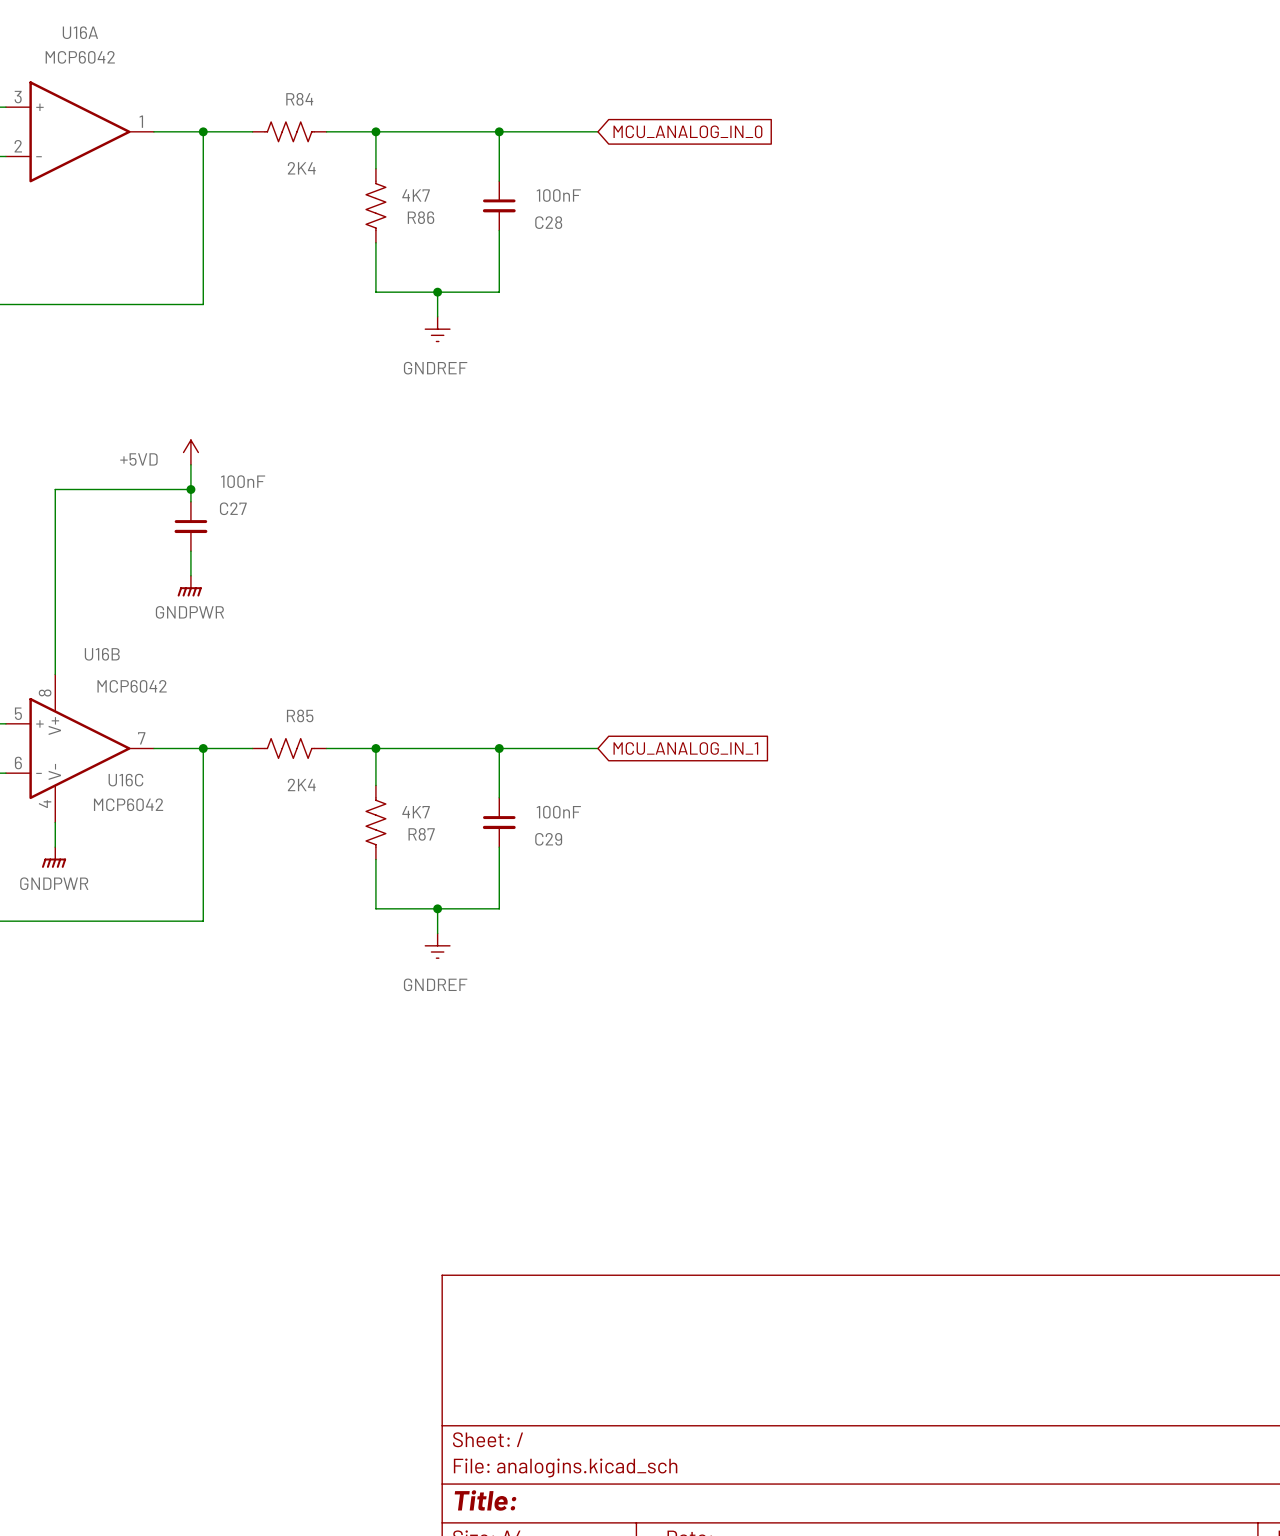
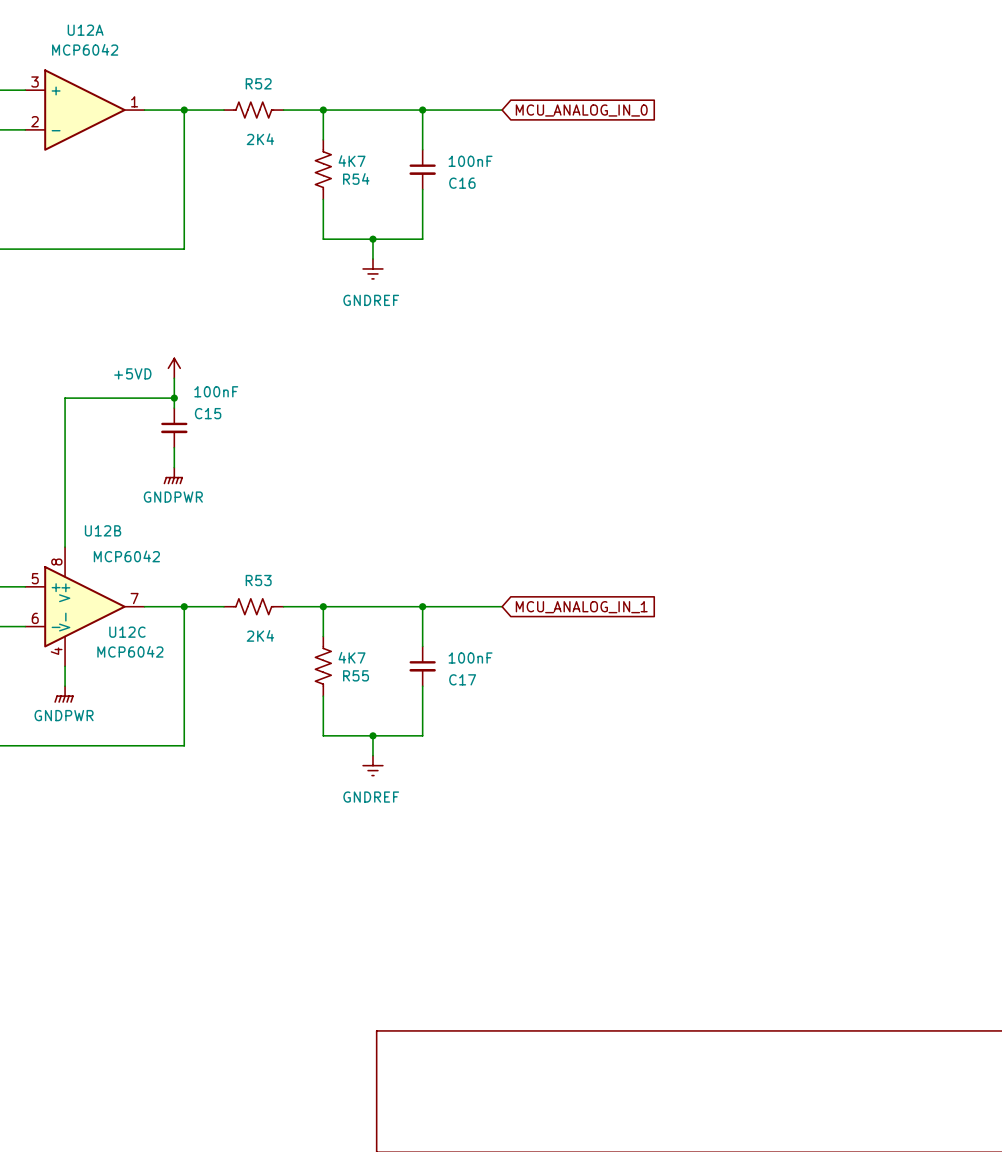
U16A name: U16A (80, 32) -> U12A (85, 30)
R84 name: R84 (299, 99) -> R52 (258, 83)
R86 name: R86 (421, 217) -> R54 (356, 178)
C28 name: C28 (548, 222) -> C16 (462, 183)
C27 name: C27 (233, 508) -> C15 (208, 413)
U16B name: U16B (102, 654) -> U12B (103, 530)
R85 name: R85 (300, 715) -> R53 (258, 580)
U16C name: U16C (125, 780) -> U12C (127, 632)
R87 name: R87 (421, 834) -> R55 (356, 675)
C29 name: C29 (548, 839) -> C17 (462, 679)

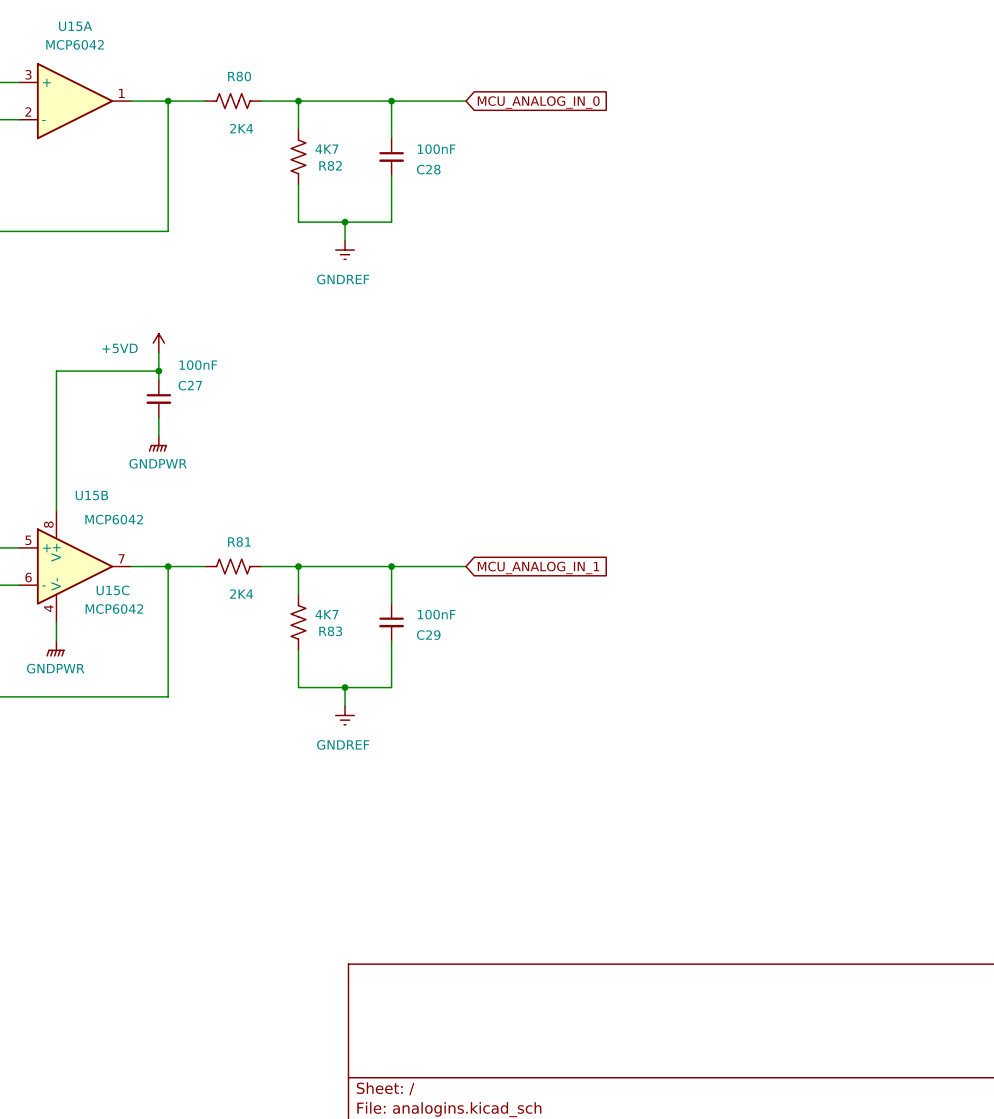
U12A name: U12A (85, 30) -> U15A (75, 26)
R52 name: R52 (258, 83) -> R80 (239, 76)
R54 name: R54 (356, 178) -> R82 (330, 165)
C16 name: C16 (462, 183) -> C28 (428, 169)
C15 name: C15 (208, 413) -> C27 (190, 385)
U12B name: U12B (103, 530) -> U15B (91, 495)
R53 name: R53 (258, 580) -> R81 (239, 542)
U12C name: U12C (127, 632) -> U15C (113, 590)
R55 name: R55 (356, 675) -> R83 (330, 631)
C17 name: C17 (462, 679) -> C29 (428, 635)

